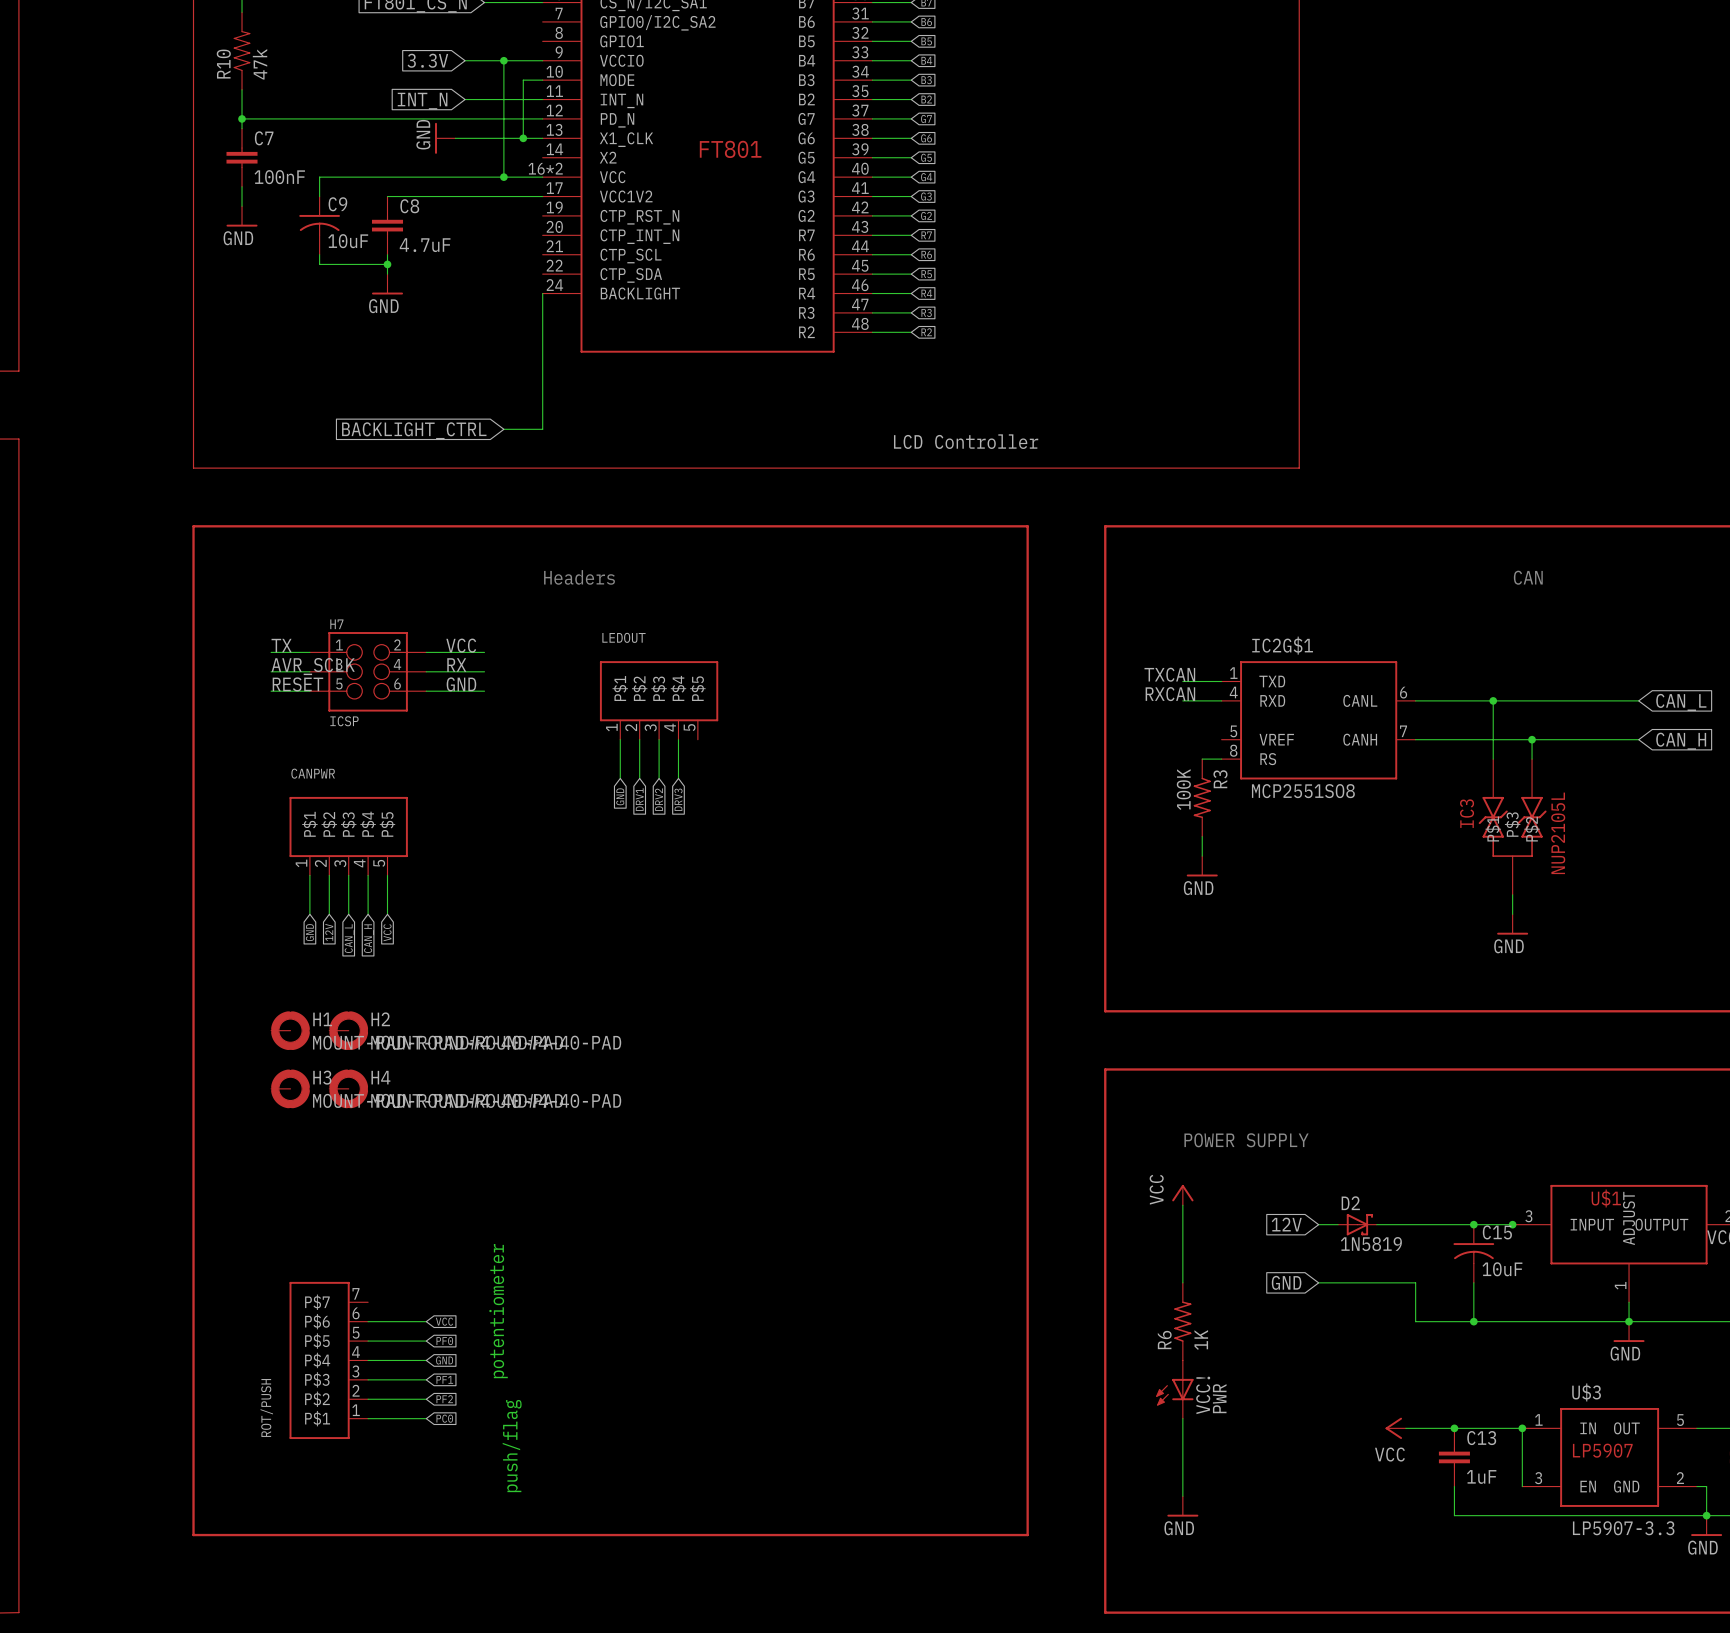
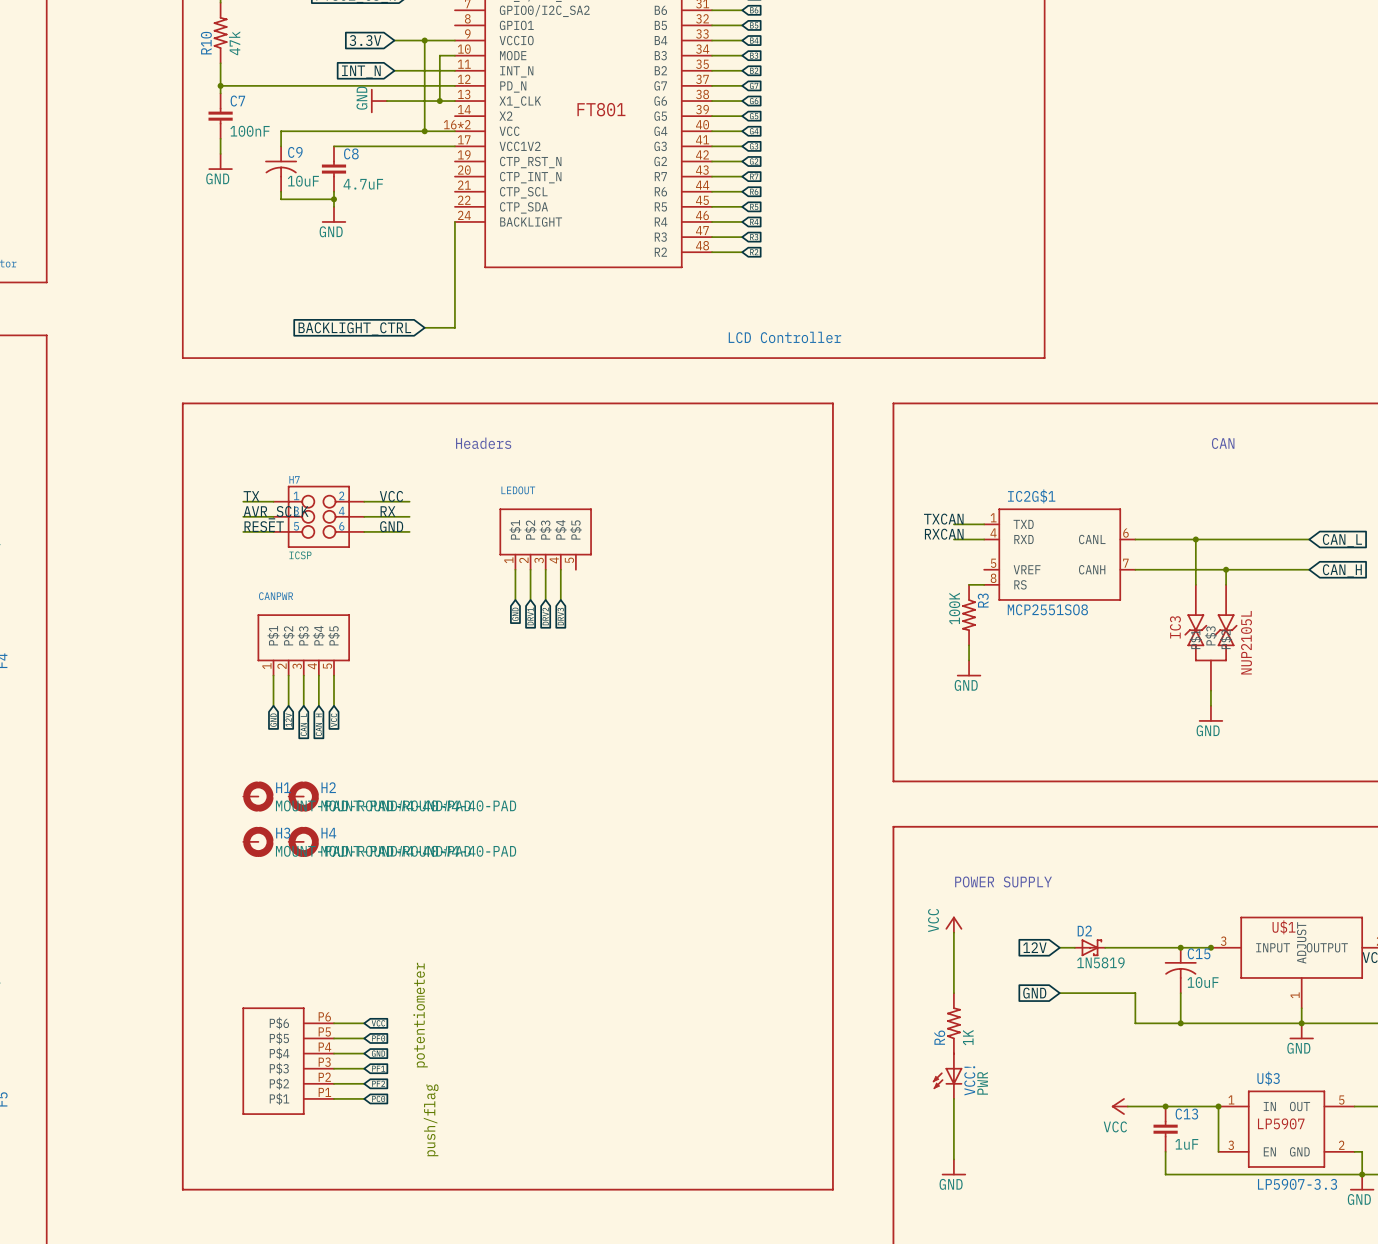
ROT/PUSH: (328, 1360) -> none
part: none -> (288, 1061)

